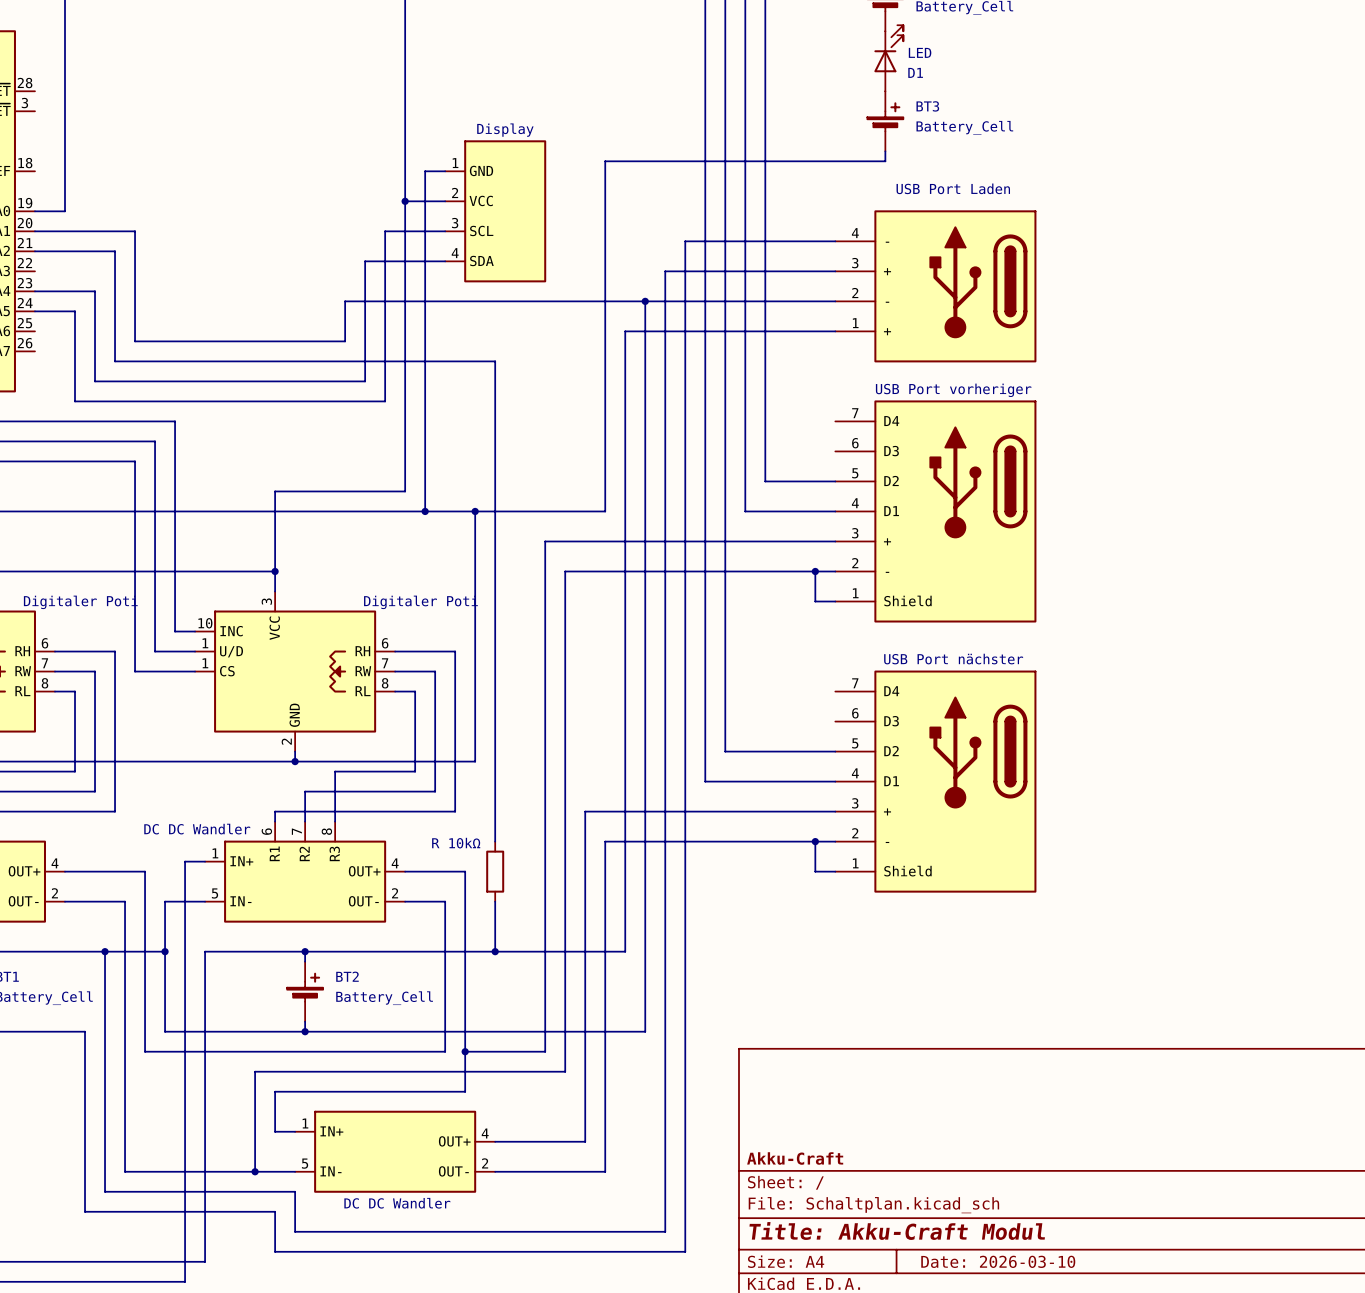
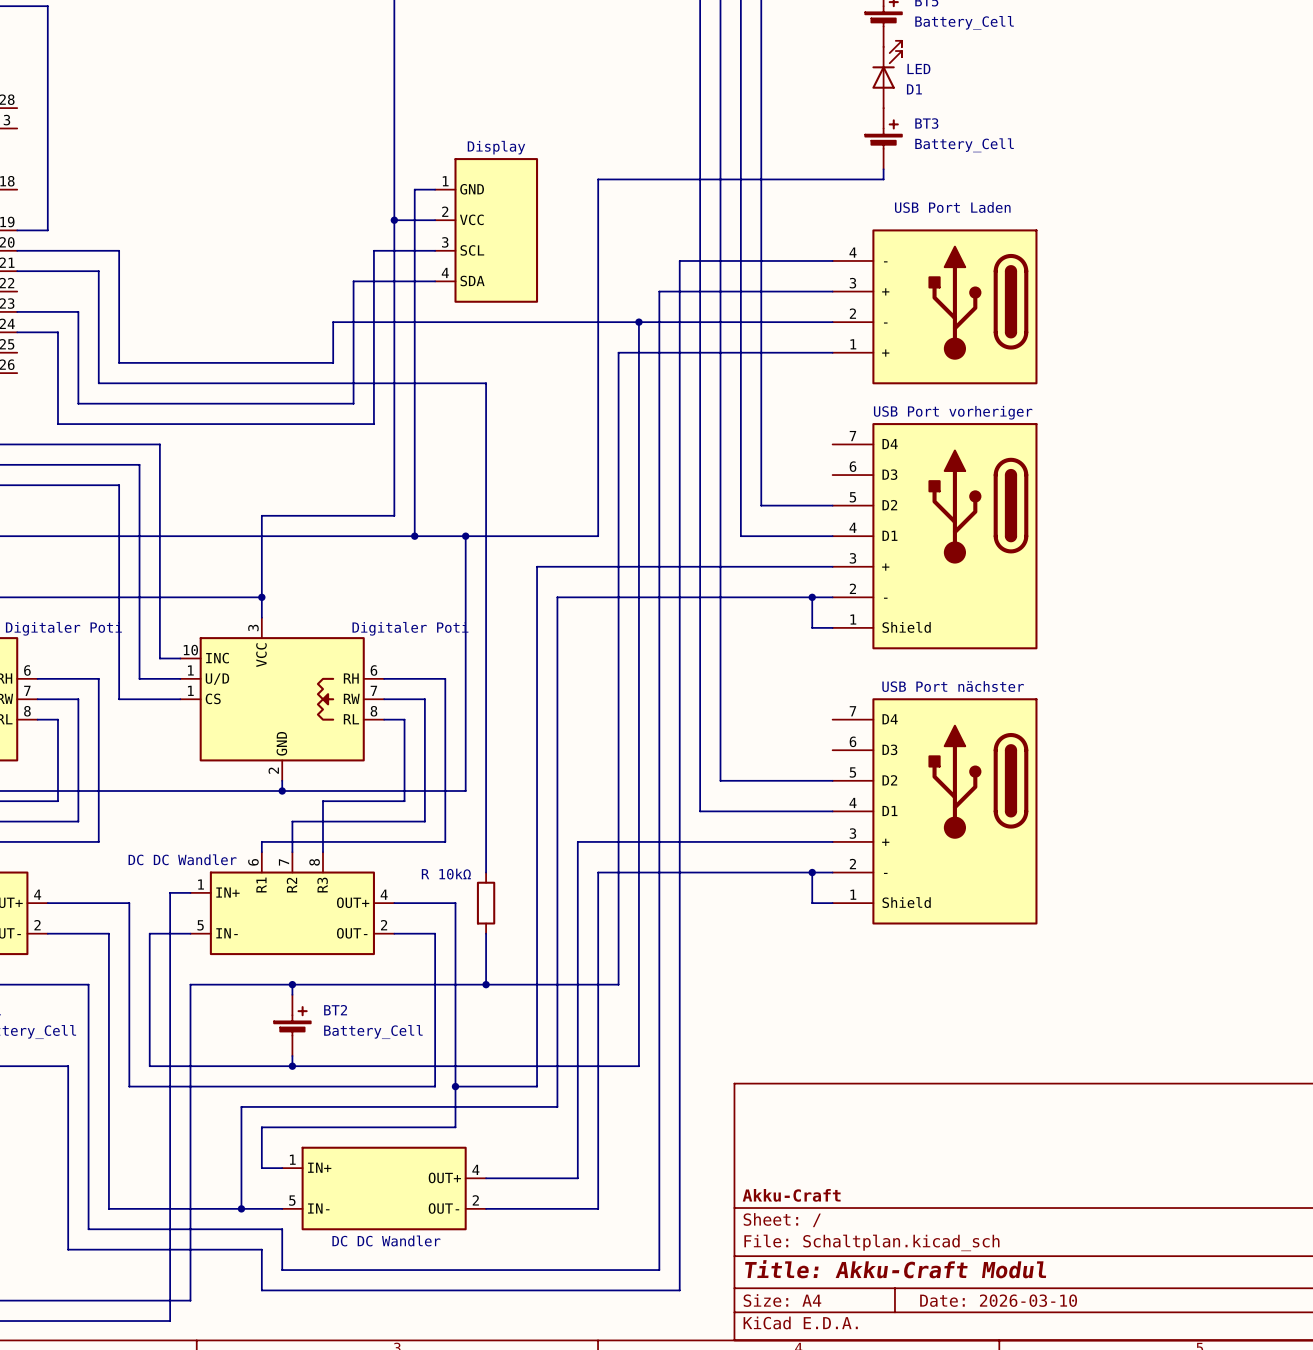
wire: (105, 951) (165, 951) -> none
junction: (105, 951) -> none
junction: (165, 951) -> none

